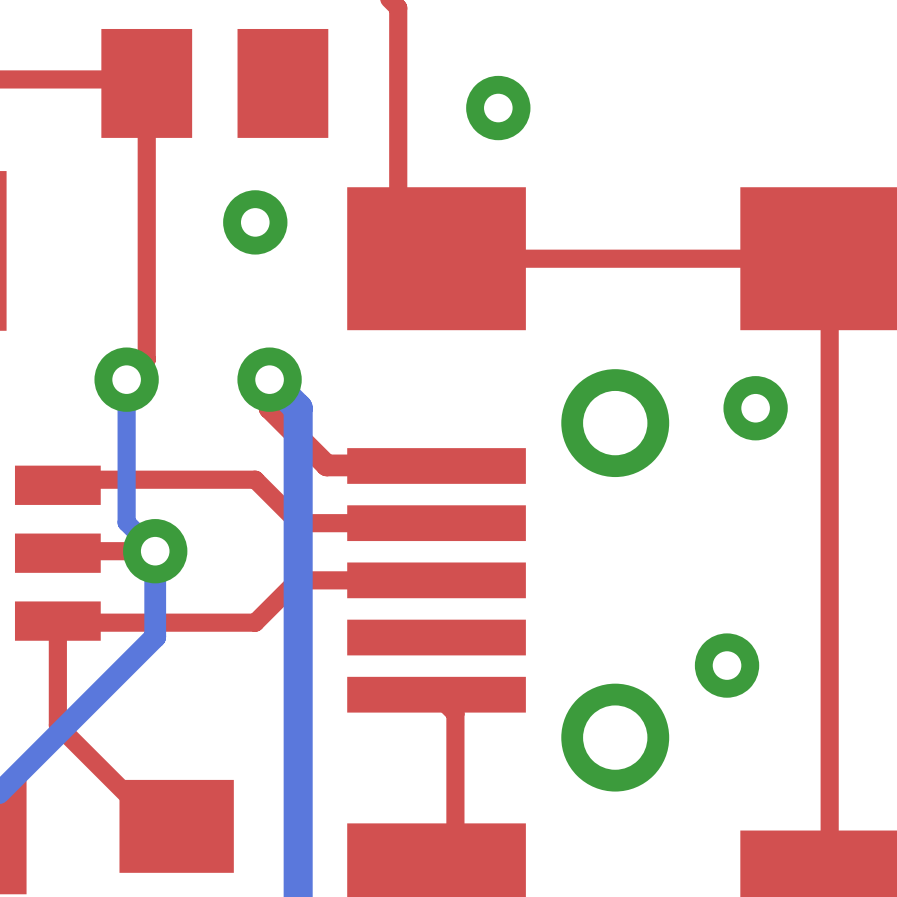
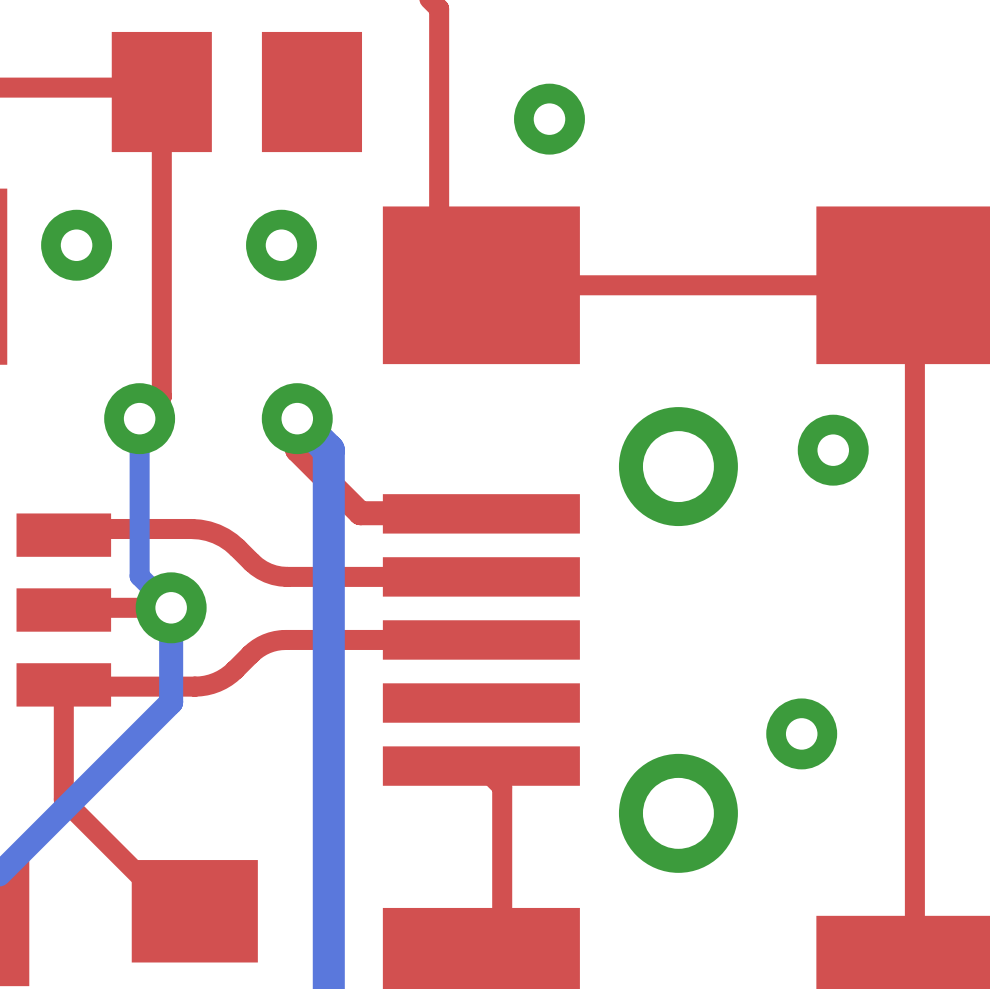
via: none -> (76, 245)
top track: (173, 479) (255, 479) (298, 523) -> (191, 528) (208, 531) (224, 537) (256, 566) (267, 573) (287, 576) (329, 576)
top track: (297, 580) (255, 622) (176, 622) -> (328, 639) (285, 639) (271, 642) (254, 651) (221, 679) (205, 685) (194, 686)

